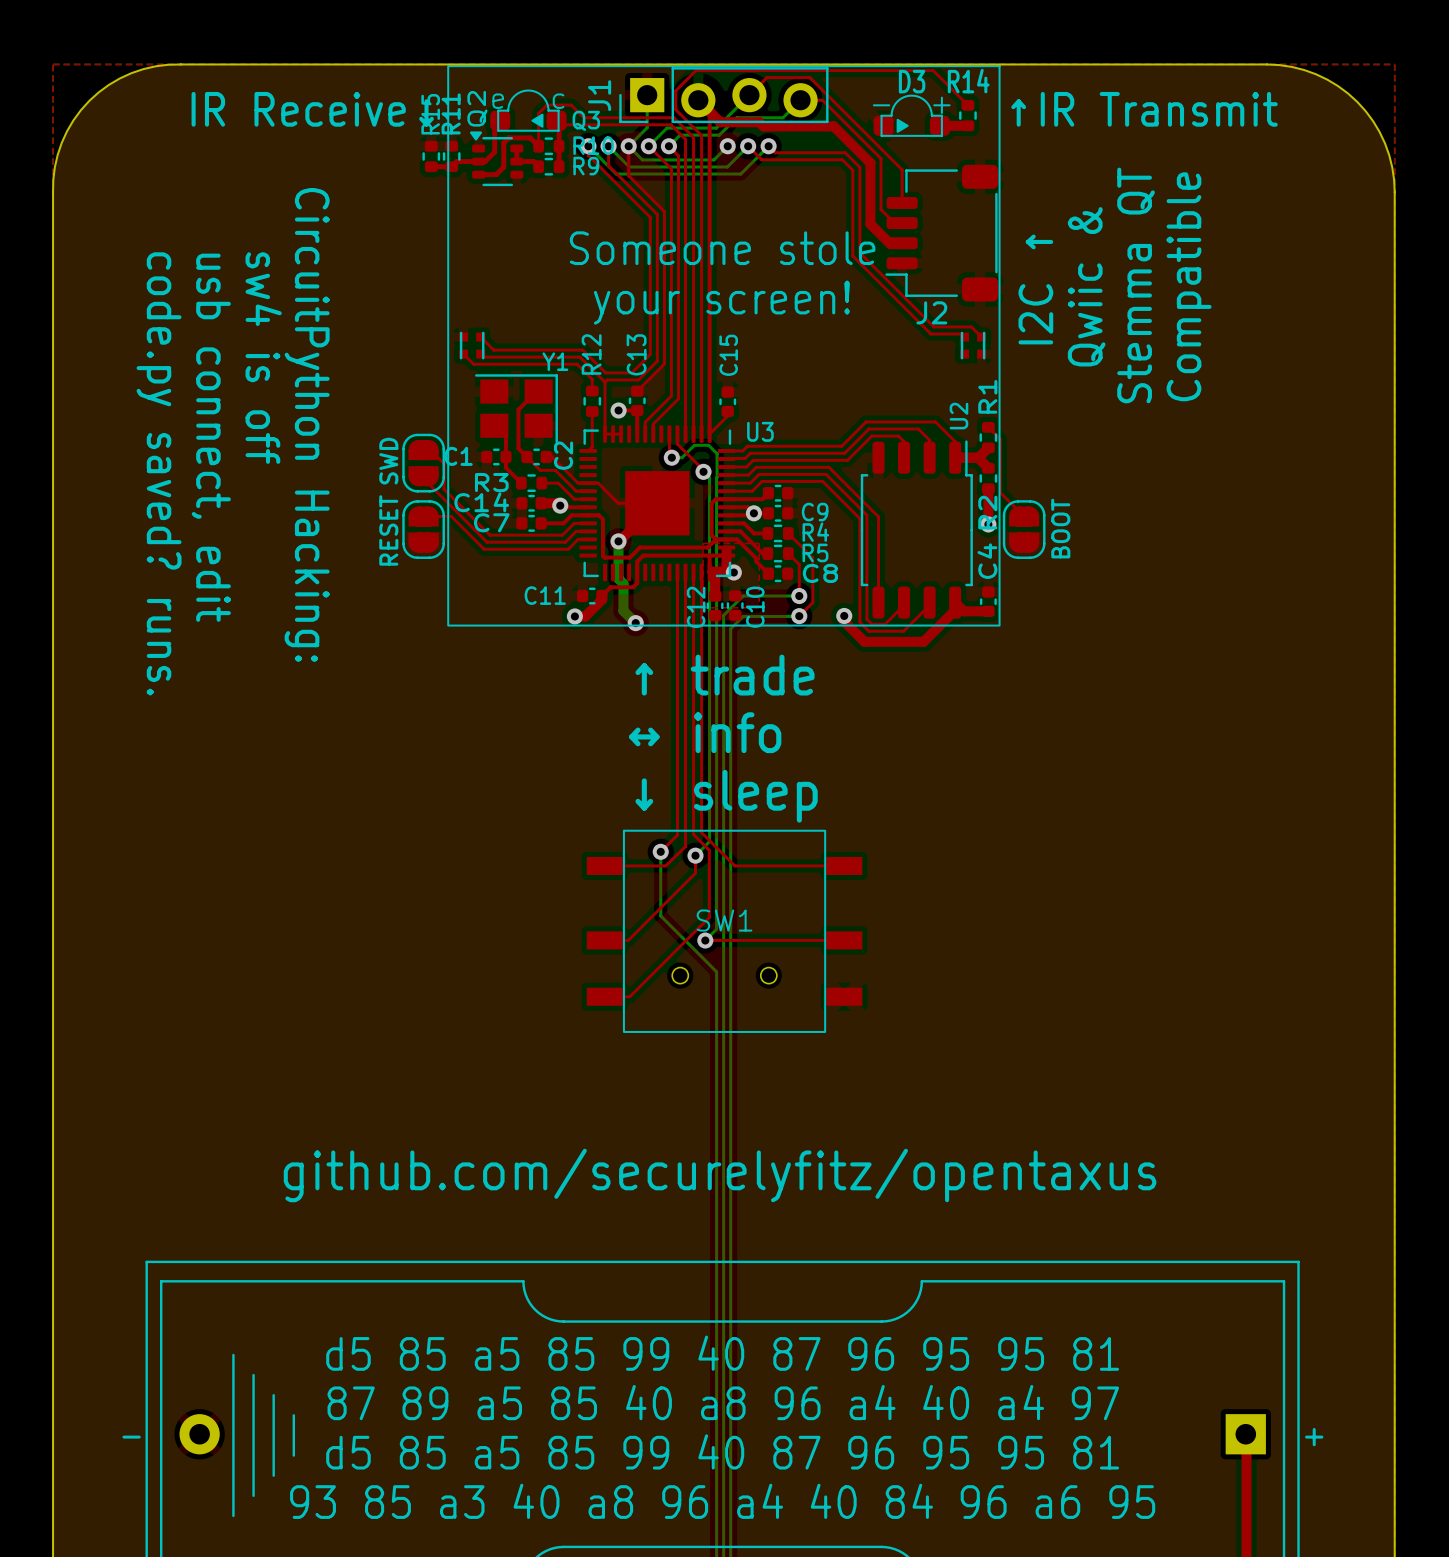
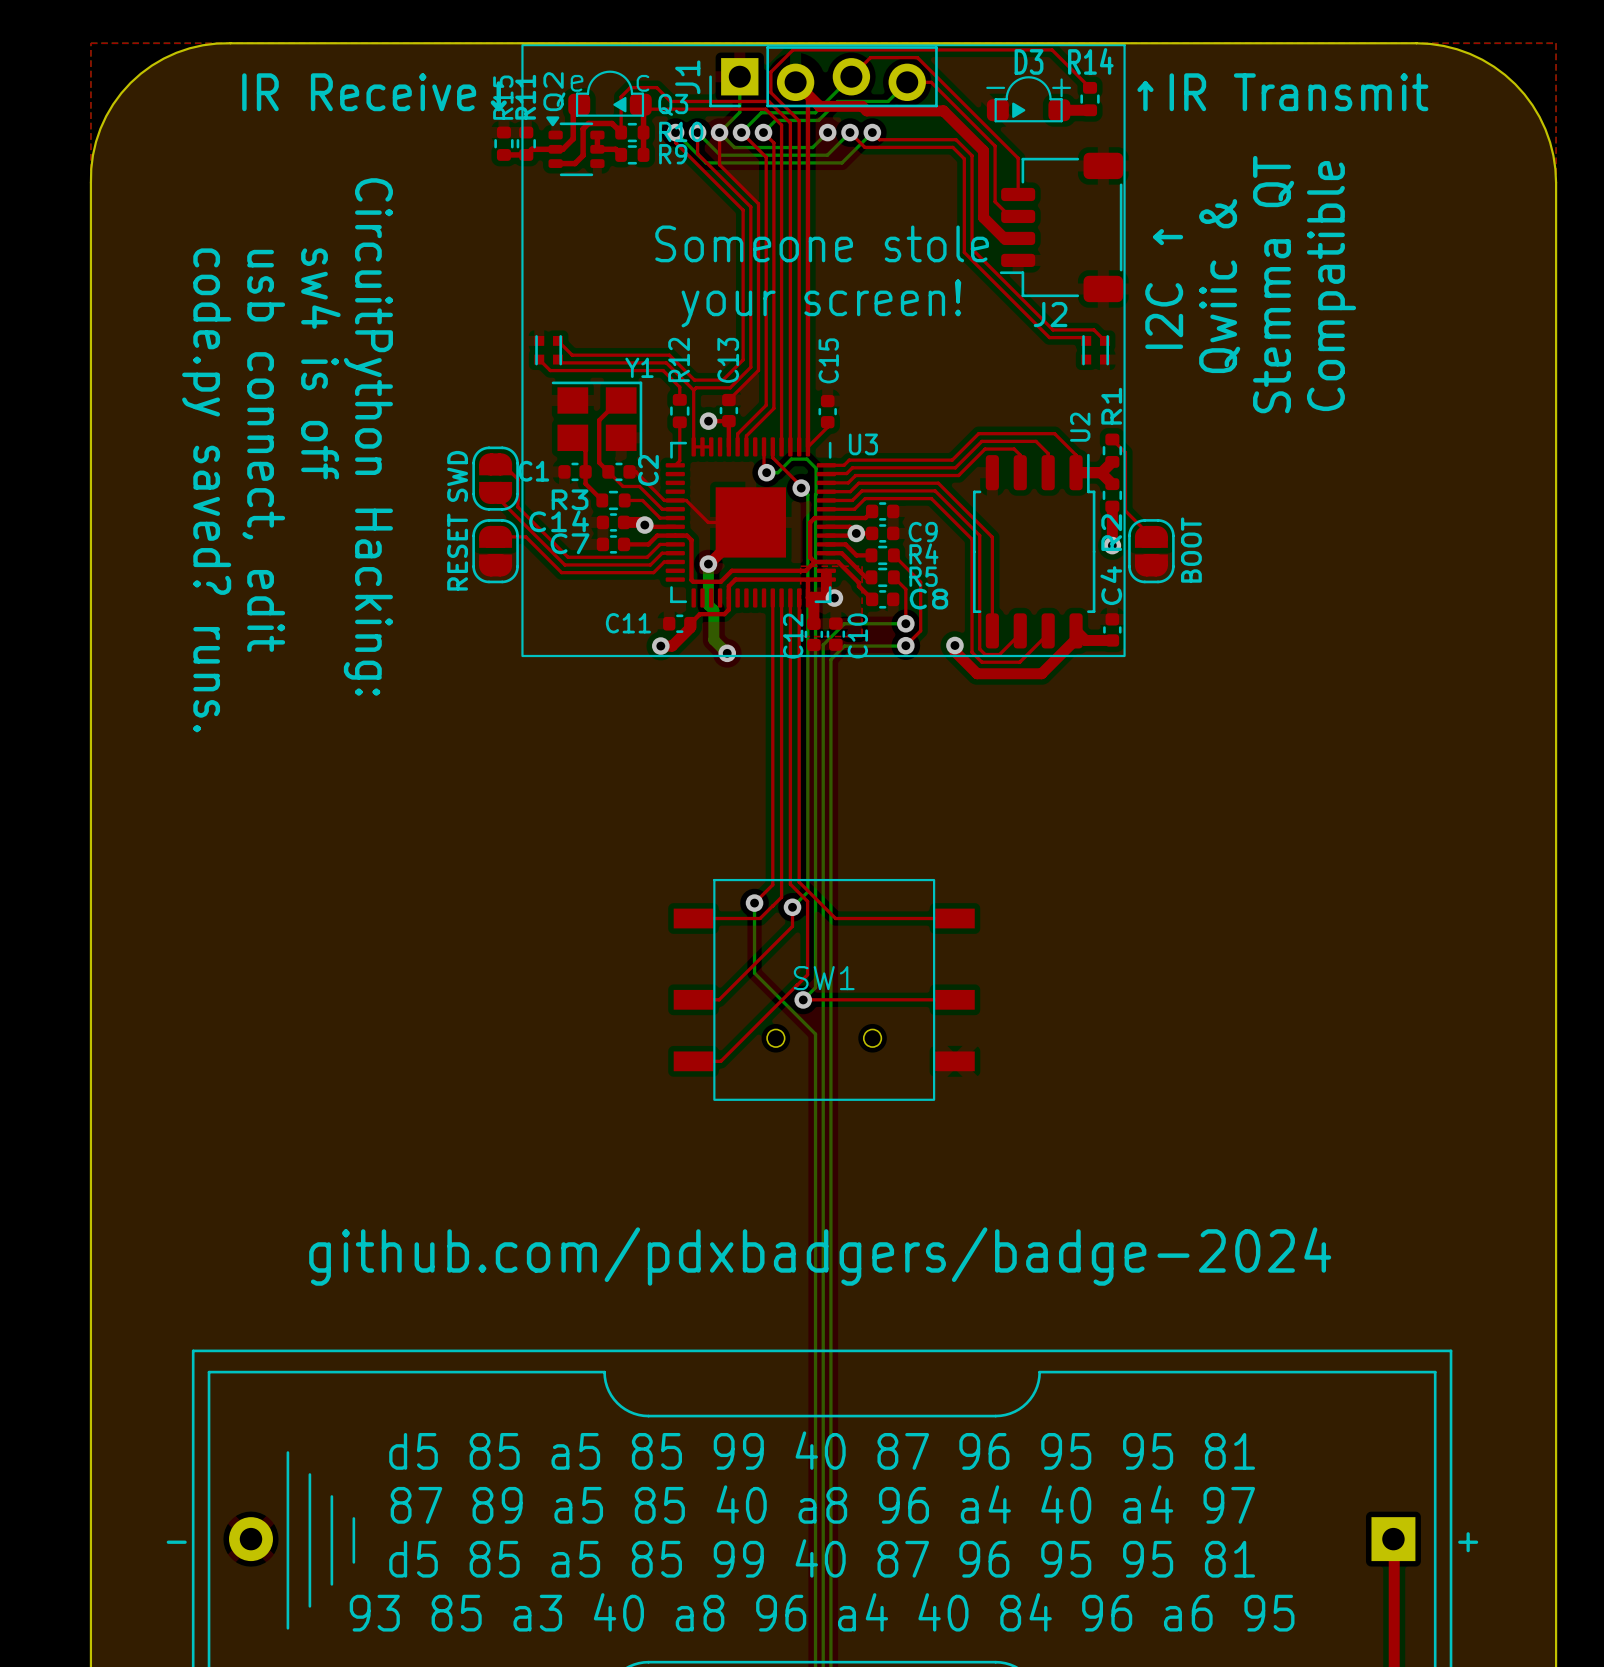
text: ↑ trade (725, 675) -> none
text: ↔ info (705, 732) -> none
text: ↓ sleep (726, 796) -> none
text: github.com/securelyfitz/opentaxus (720, 1175) -> github.com/pdxbadgers/badge-2024 (820, 1256)

